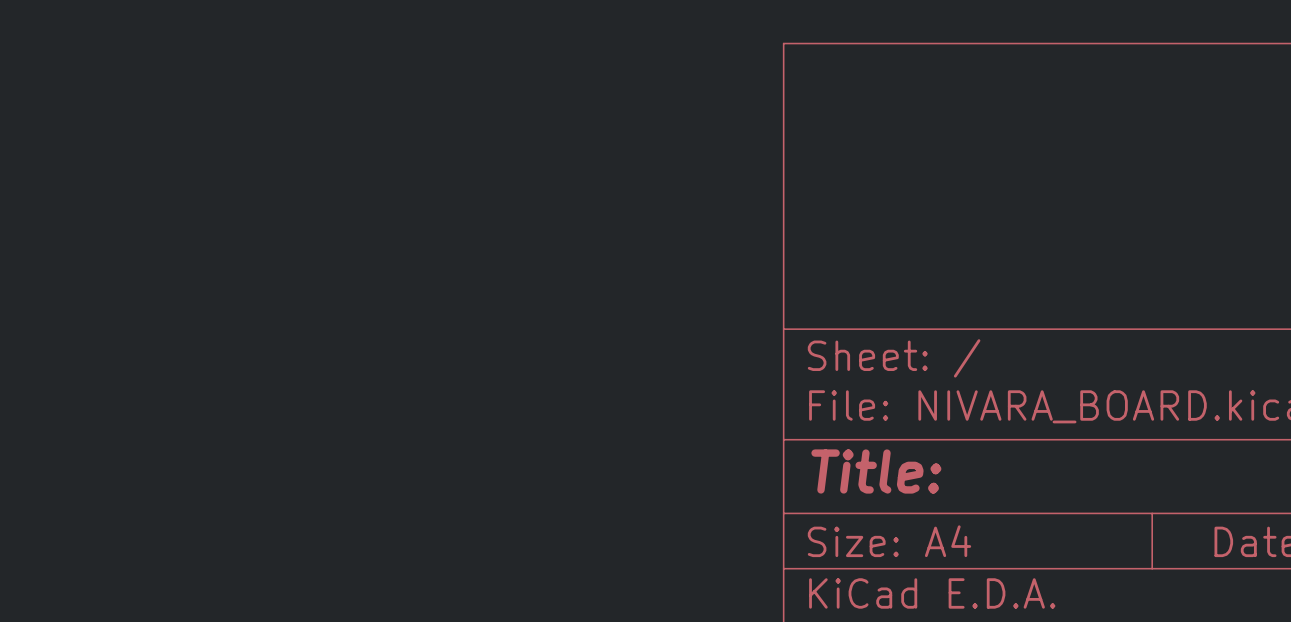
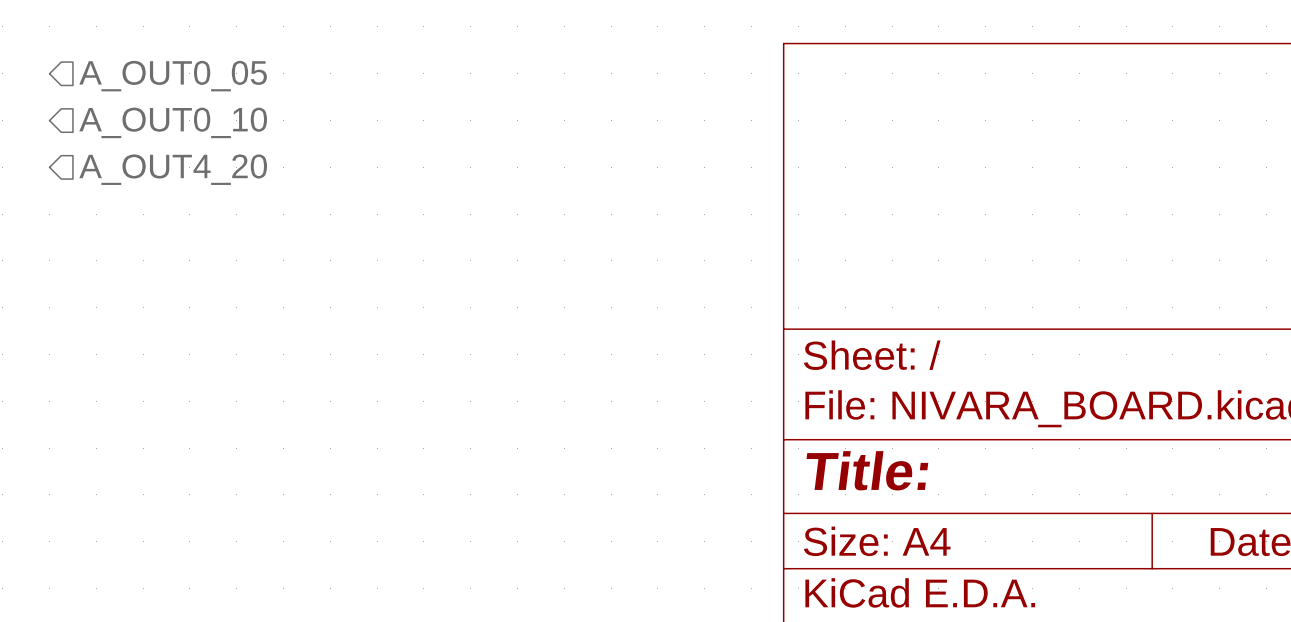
hierarchical label: none -> A_OUT0_05 (173, 76)
hierarchical label: none -> A_OUT0_10 (173, 122)
hierarchical label: none -> A_OUT4_20 (173, 169)

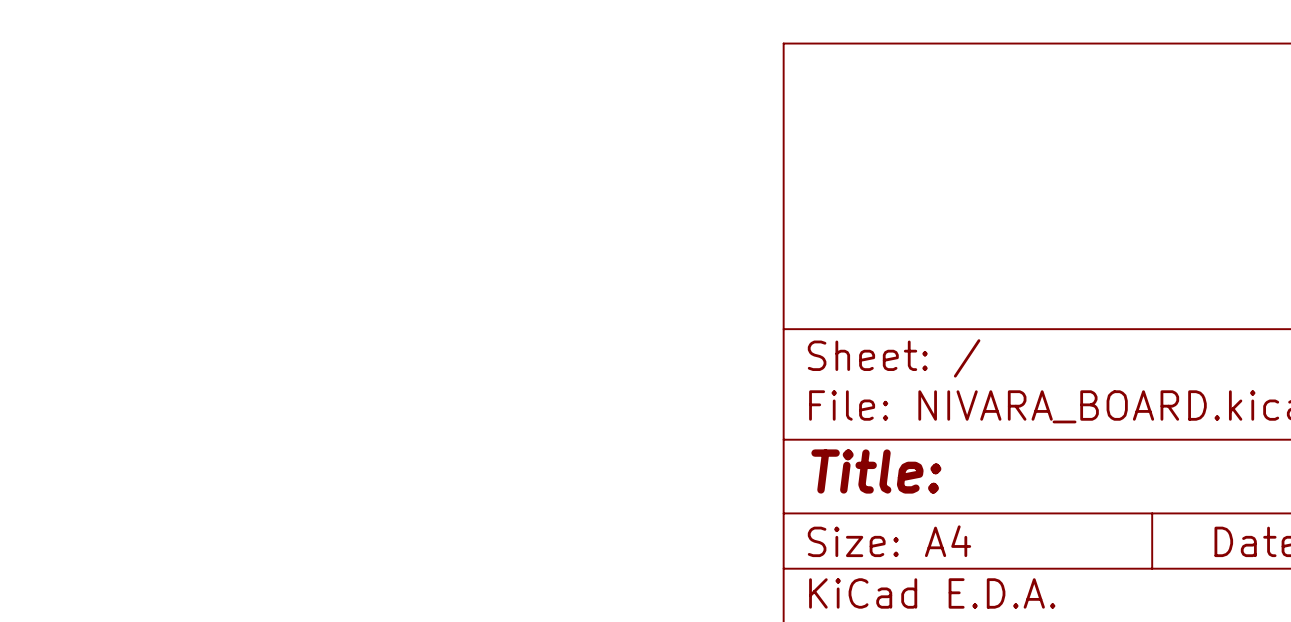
hierarchical label: A_OUT0_05 (173, 76) -> none
hierarchical label: A_OUT0_10 (173, 122) -> none
hierarchical label: A_OUT4_20 (173, 169) -> none

